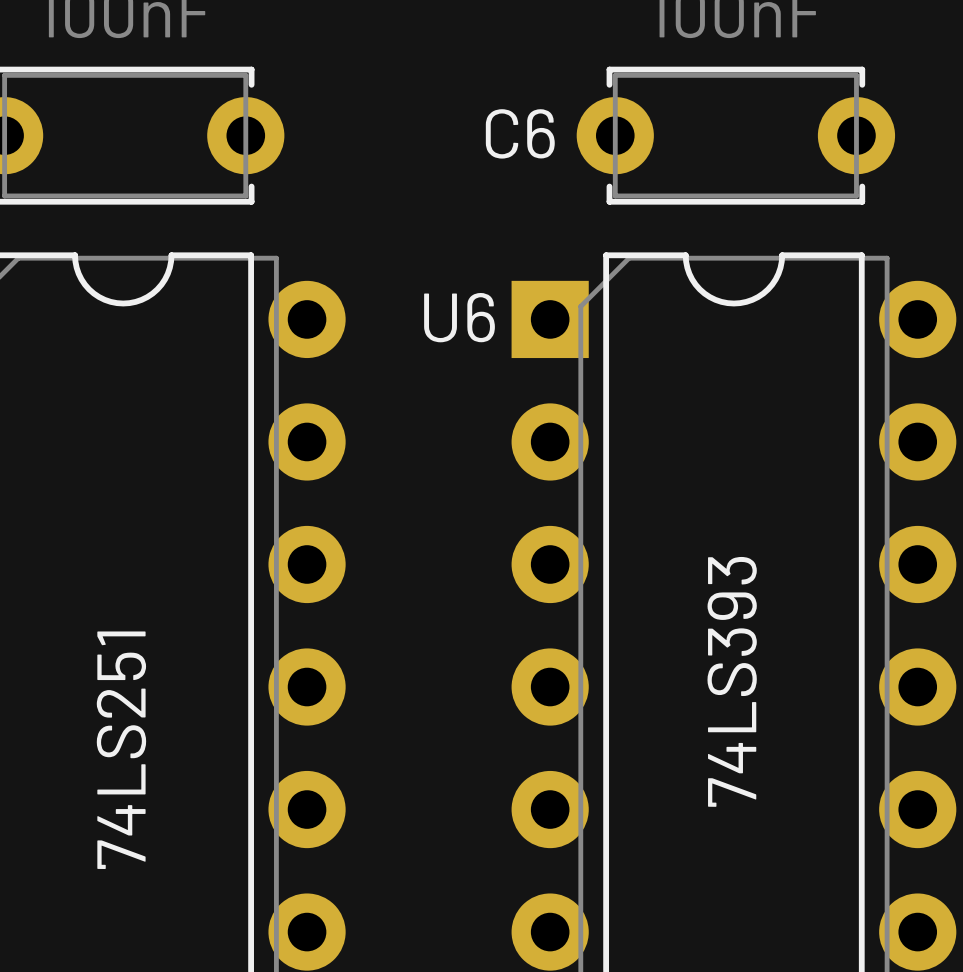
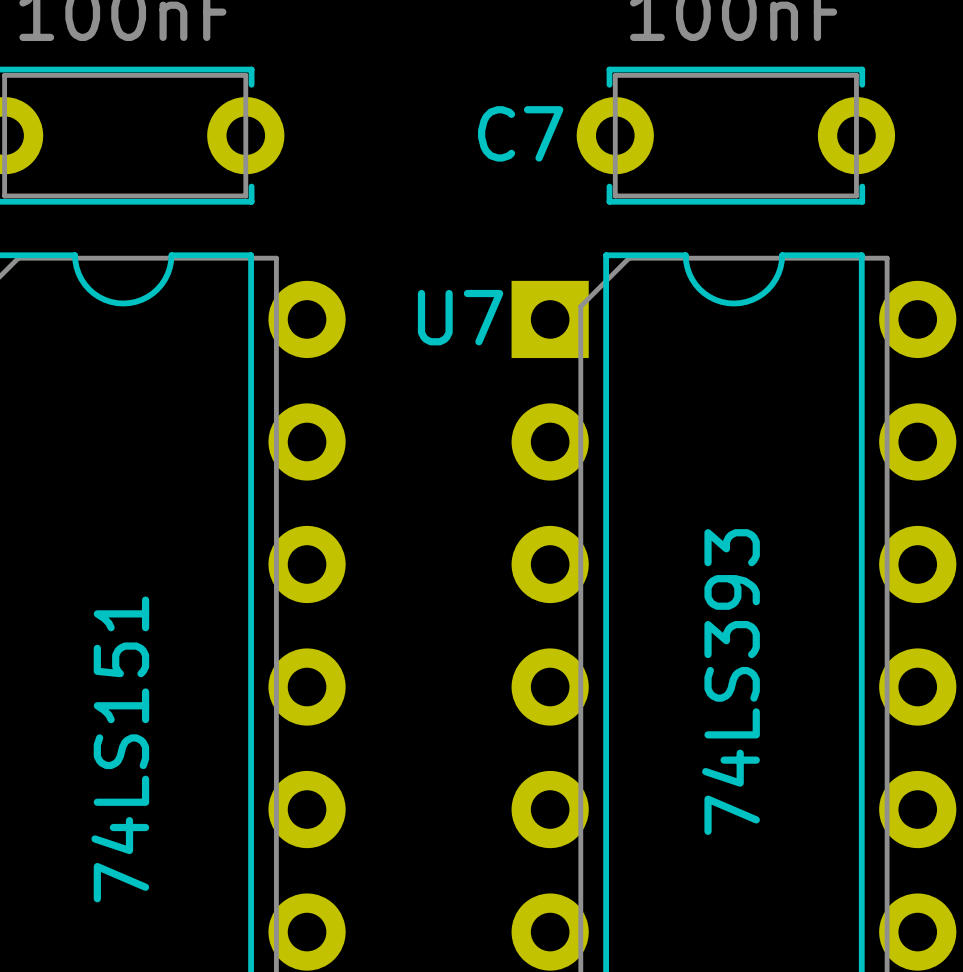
C6 name: C6 (520, 133) -> C7 (520, 133)
U6 name: U6 (459, 317) -> U7 (460, 317)
part value: 74LS251 (121, 750) -> 74LS151 (120, 749)

